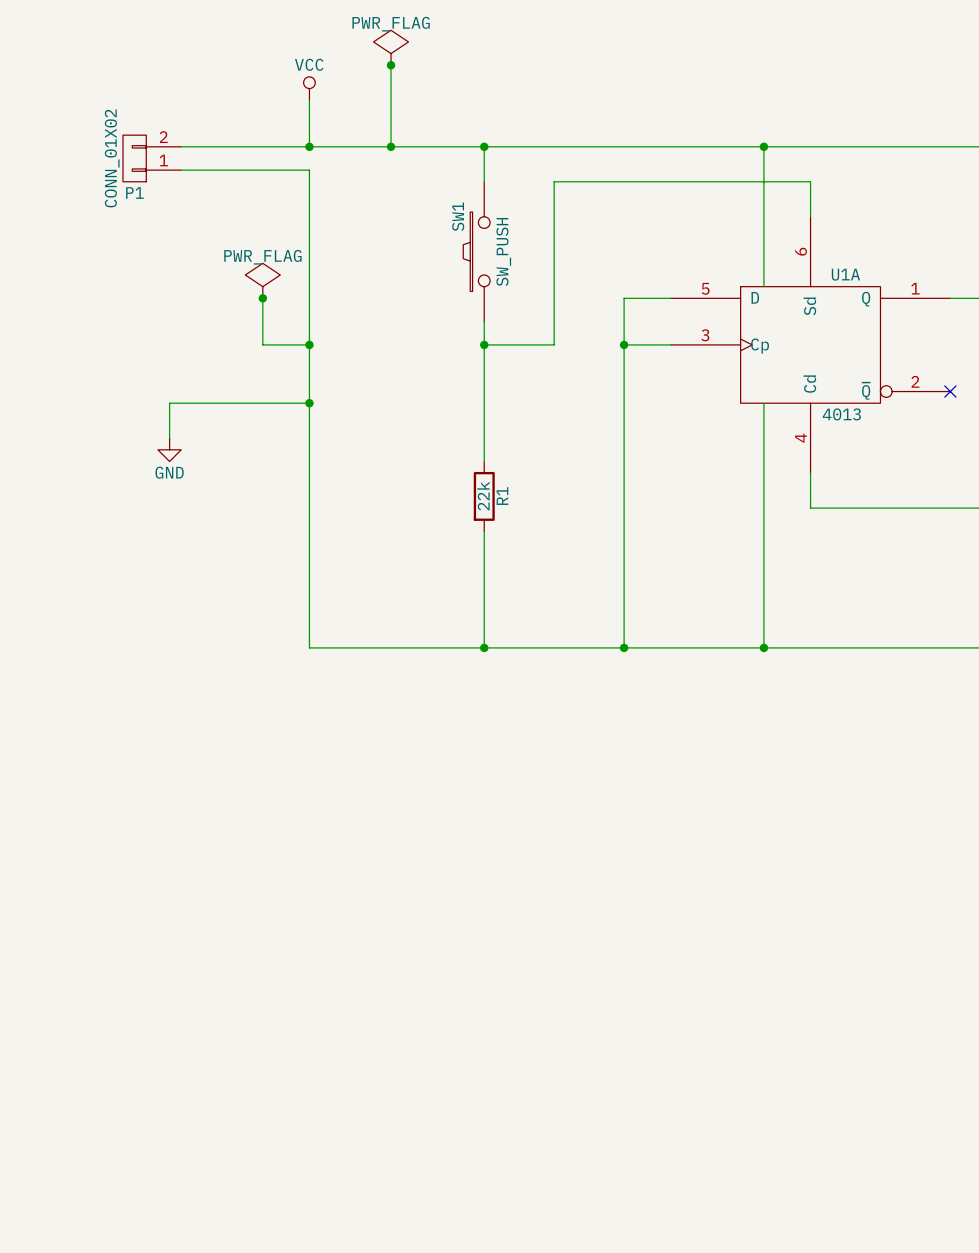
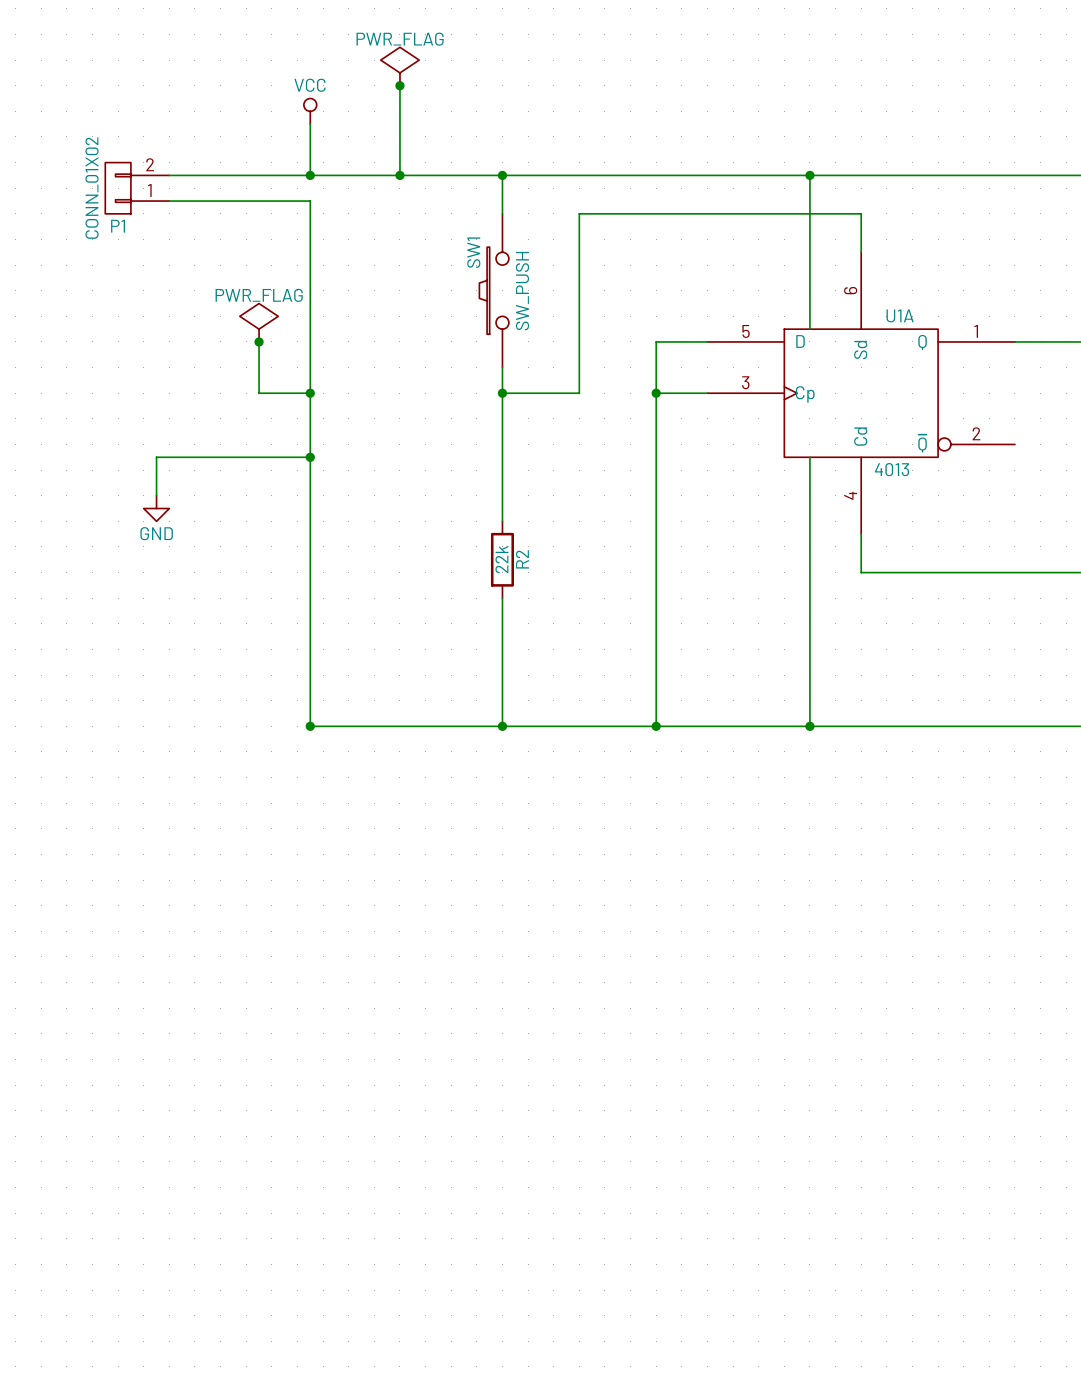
no-connect mark: (950, 391) -> none
R1 name: R1 (502, 496) -> R2 (522, 559)
junction: none -> (310, 726)

